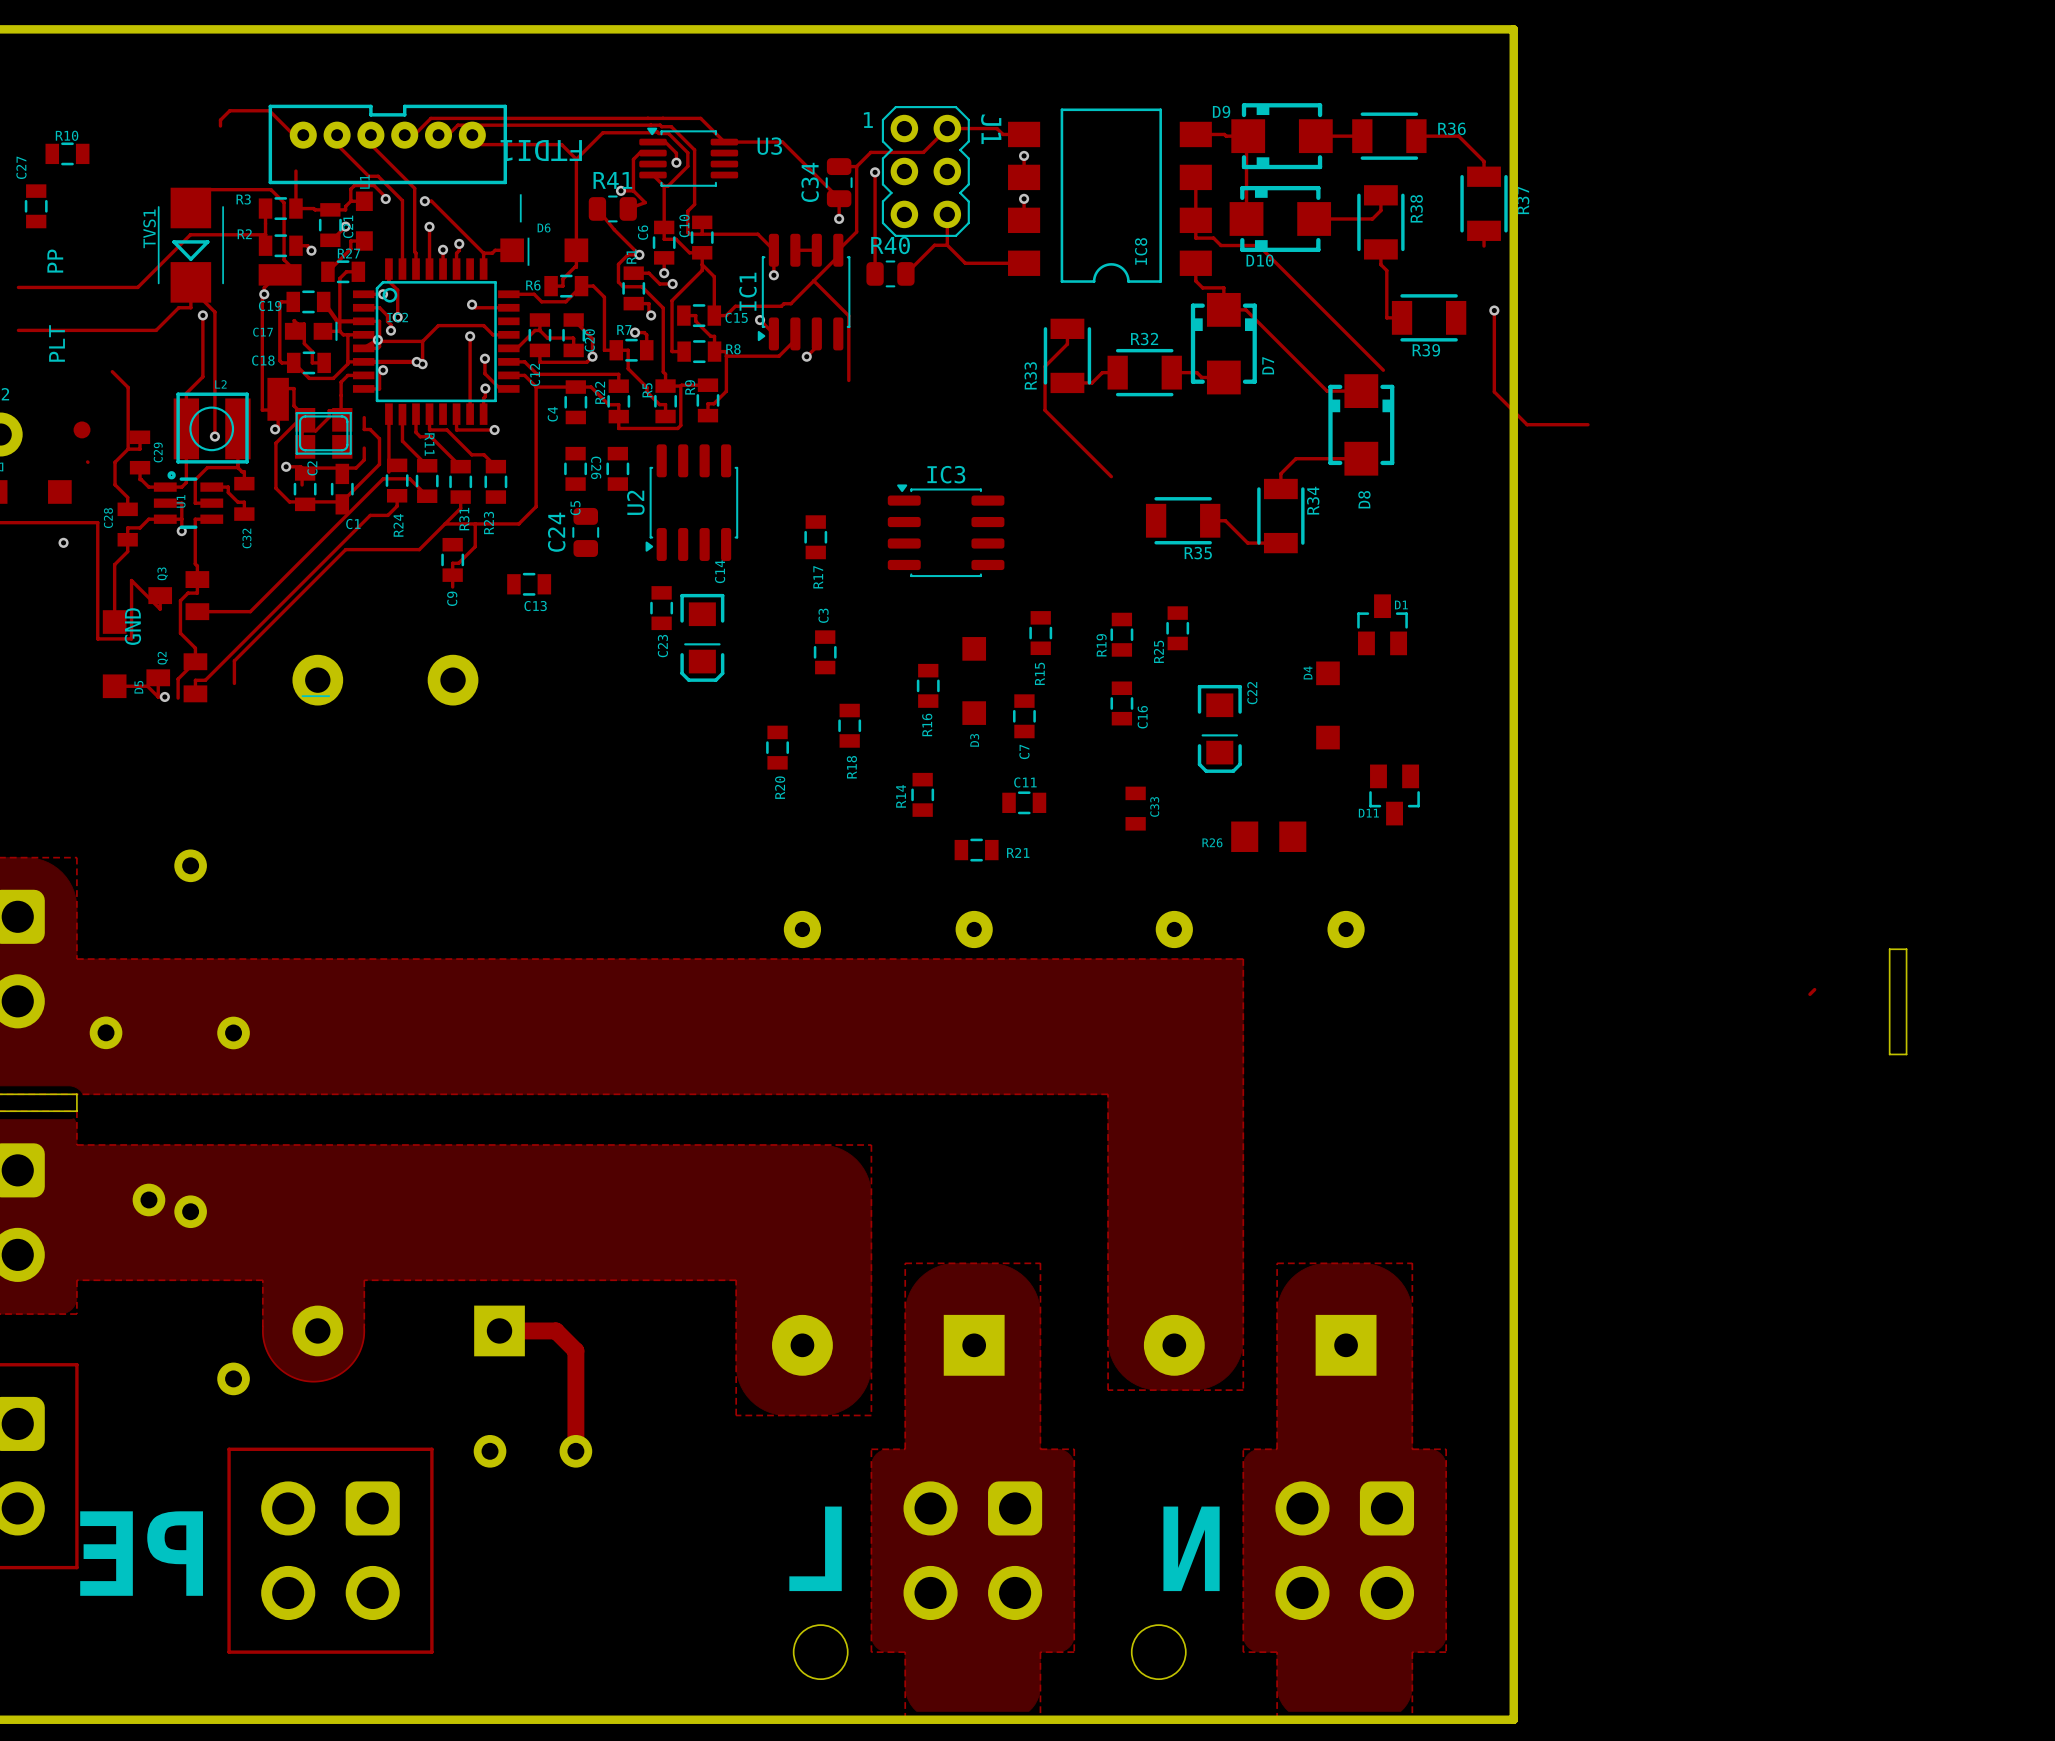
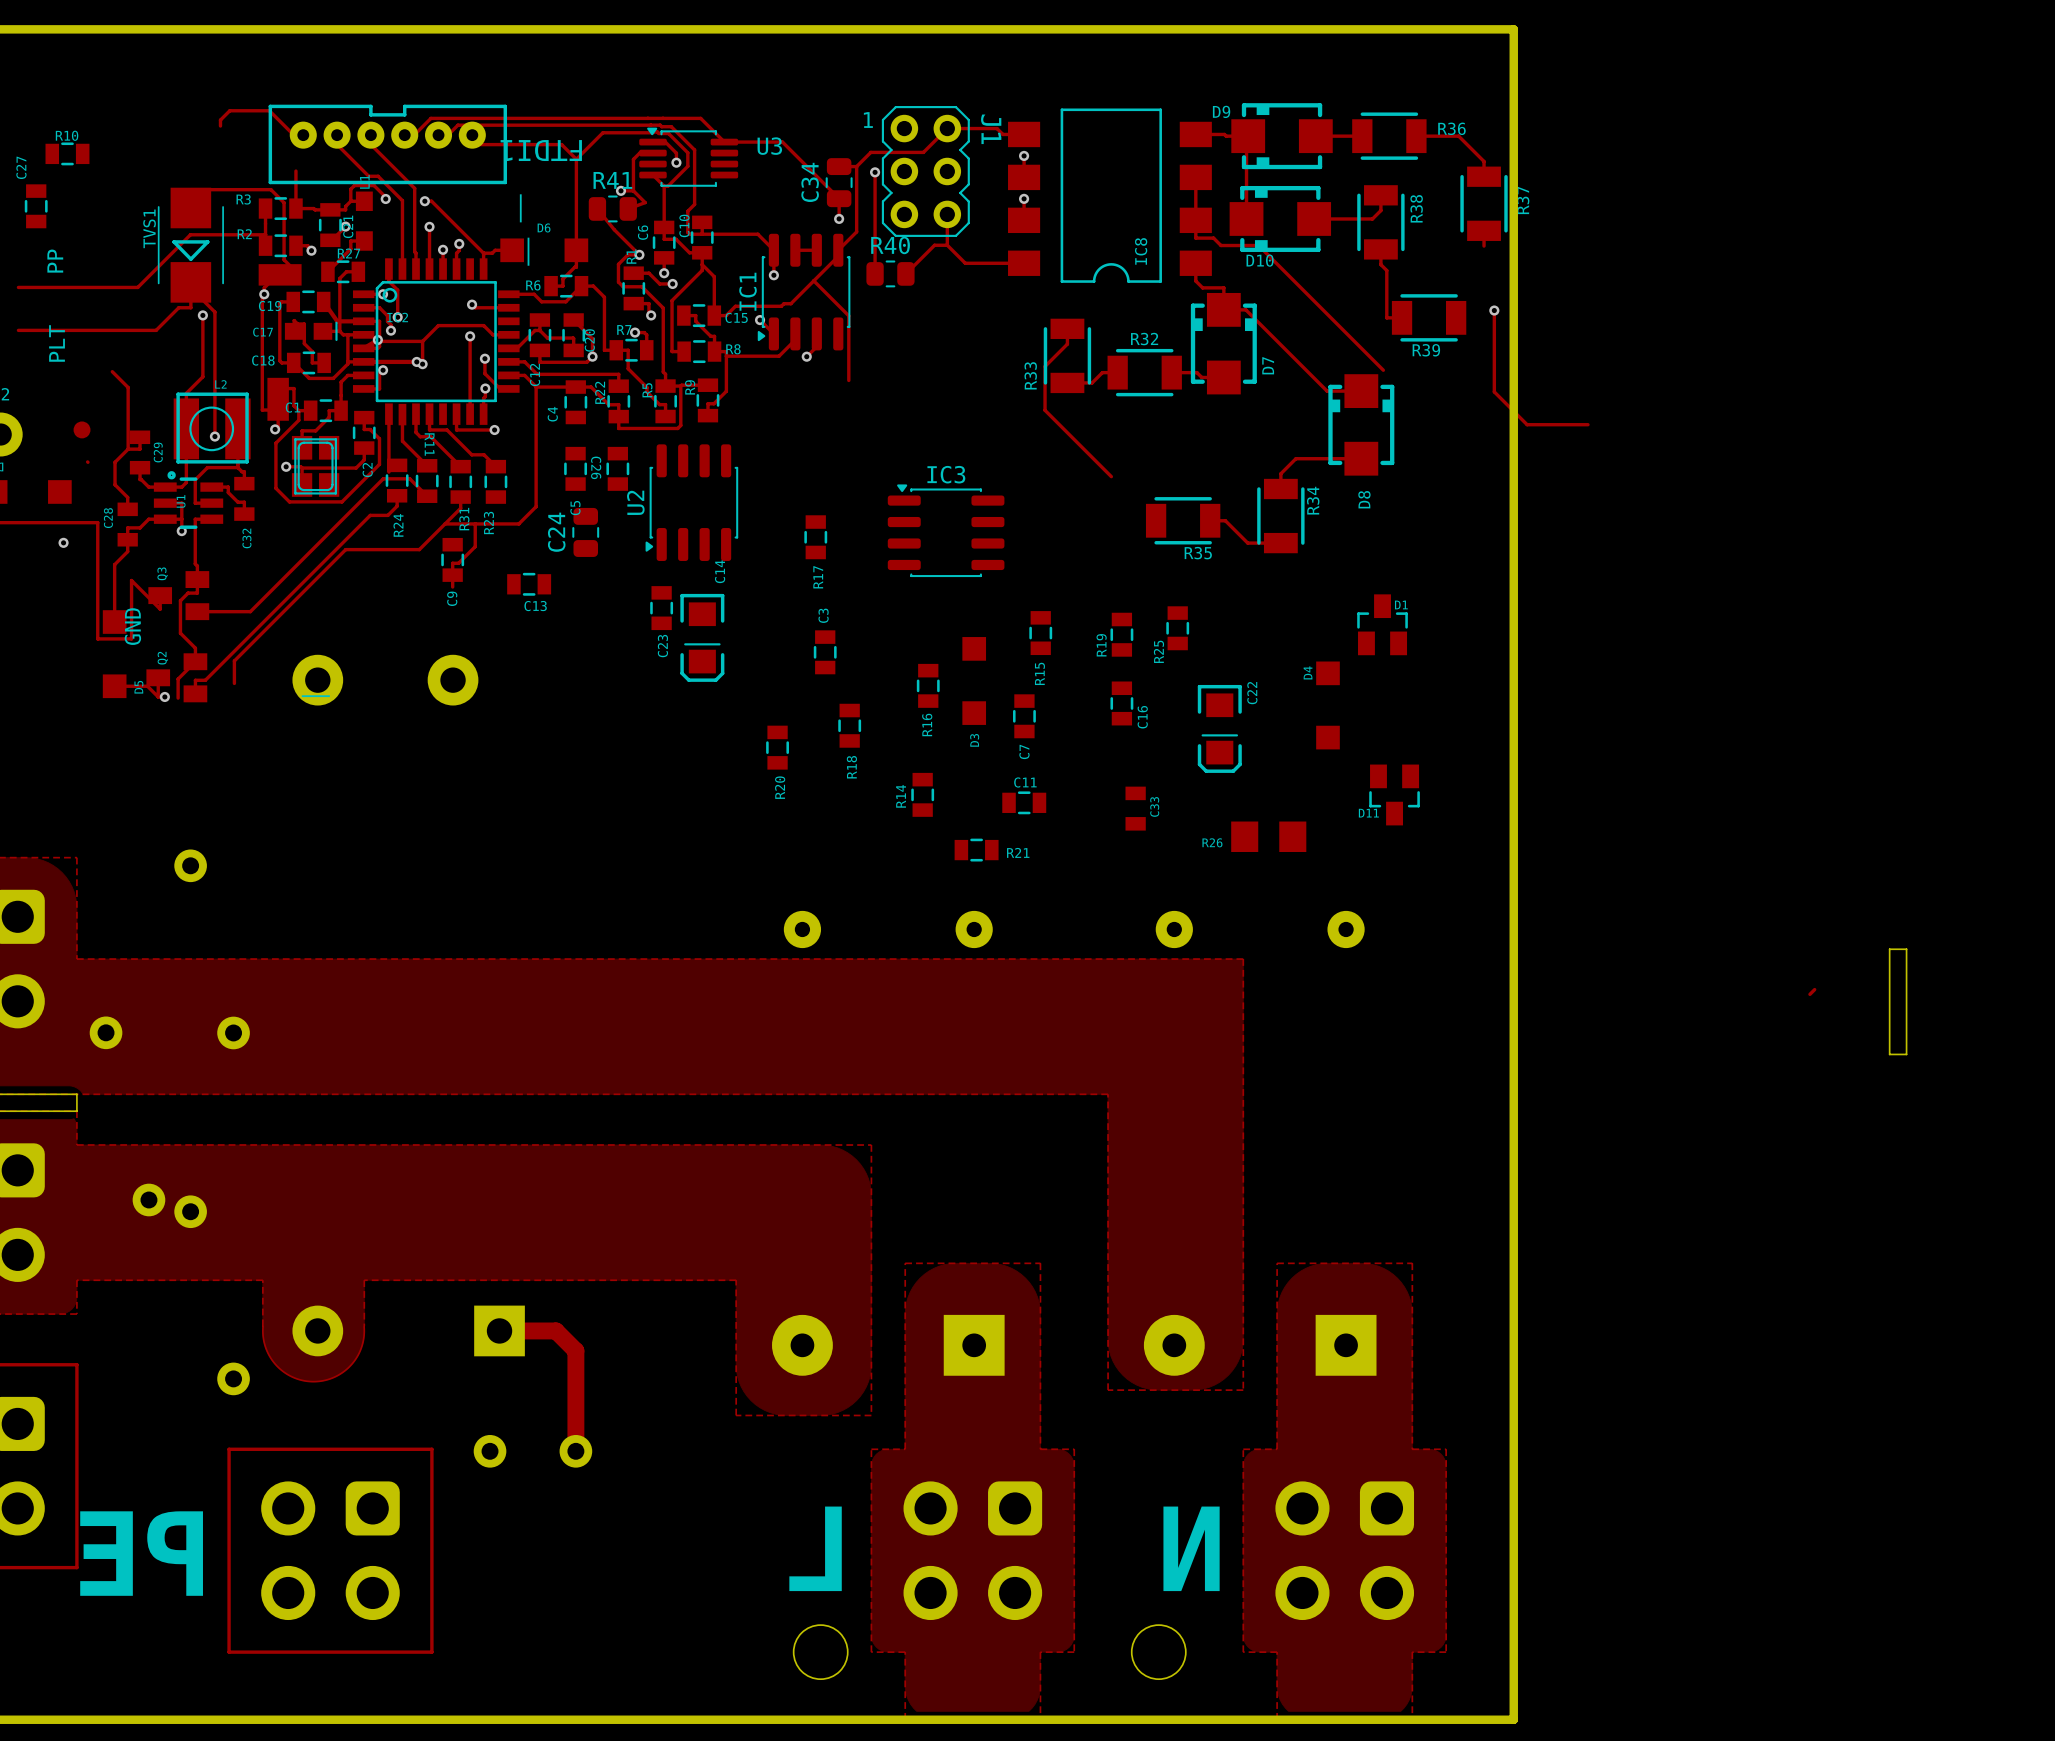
part: (323, 433) -> none
C1 footprint: [330, 463, 354, 515] -> [303, 399, 348, 423]
part: none -> (315, 466)
C2 name position: C2 (312, 468) -> C2 (367, 470)
C2 position: (305, 489) -> (364, 432)
C1 name position: C1 (353, 524) -> C1 (293, 407)

